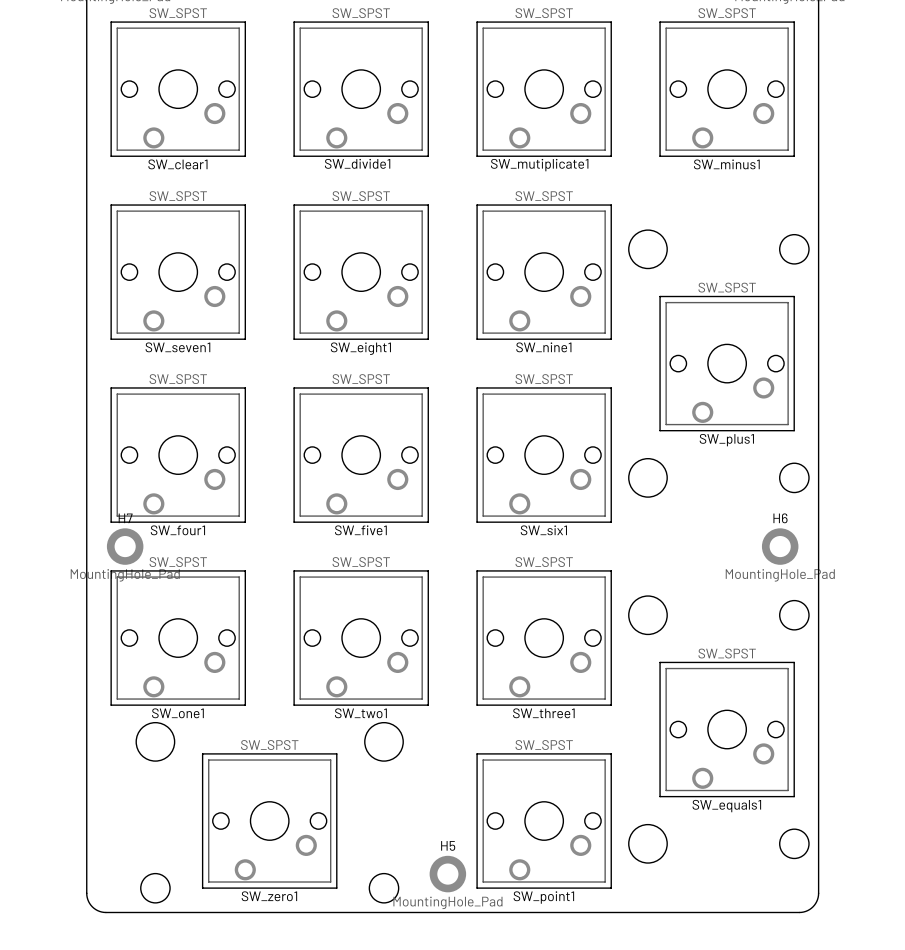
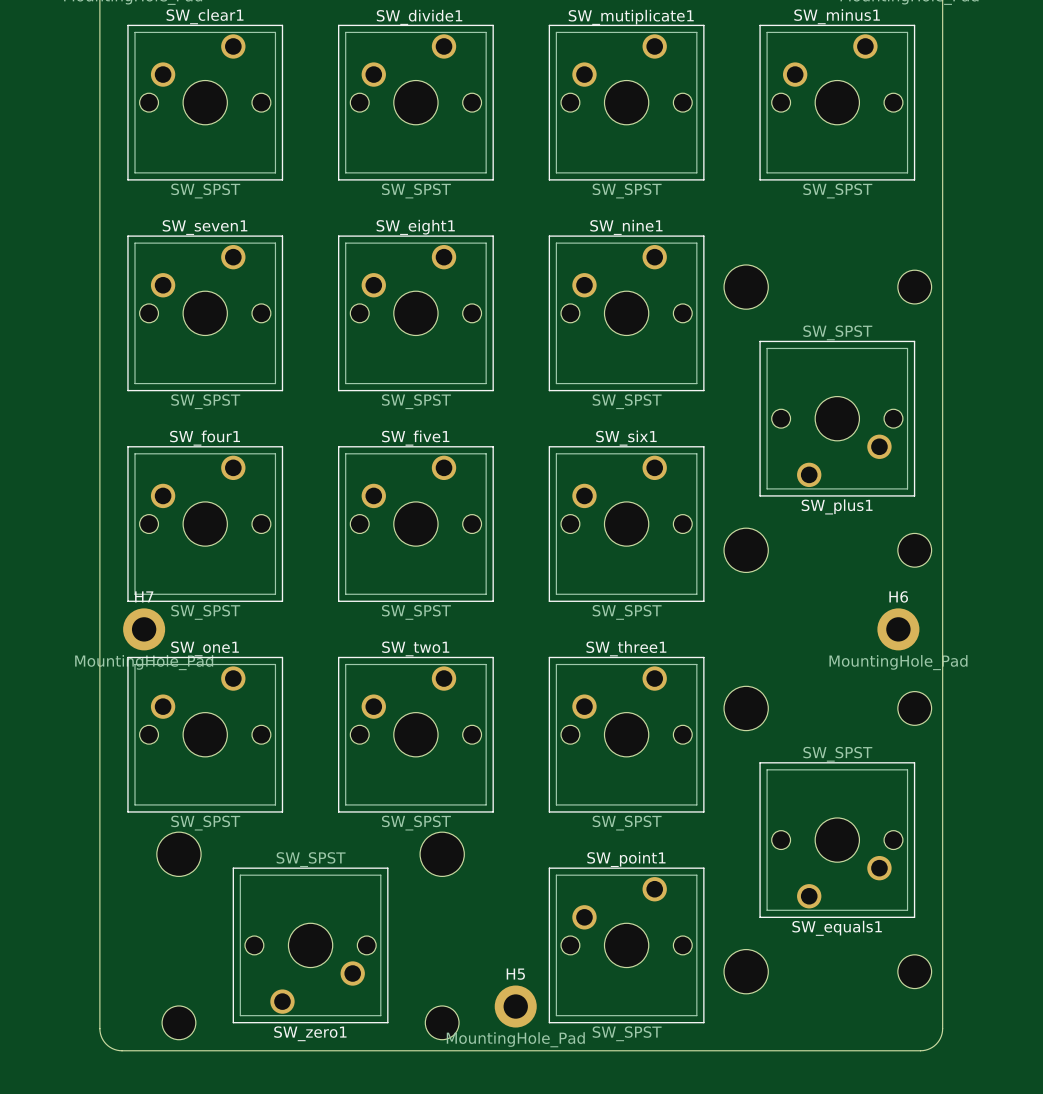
SW_clear1 rotation: 0° (178, 89) -> 180° (205, 102)
SW_divide1 rotation: 0° (361, 89) -> 180° (415, 102)
SW_mutiplicate1 rotation: 0° (544, 89) -> 180° (626, 102)
SW_minus1 rotation: 0° (727, 89) -> 180° (837, 102)
SW_seven1 rotation: 0° (178, 272) -> 180° (205, 313)
SW_eight1 rotation: 0° (361, 272) -> 180° (415, 313)
SW_nine1 rotation: 0° (544, 272) -> 180° (626, 313)
SW_four1 rotation: 0° (178, 455) -> 180° (205, 524)
SW_five1 rotation: 0° (361, 455) -> 180° (415, 524)
SW_six1 rotation: 0° (544, 455) -> 180° (626, 524)
SW_one1 rotation: 0° (178, 638) -> 180° (205, 734)
SW_two1 rotation: 0° (361, 638) -> 180° (415, 734)
SW_three1 rotation: 0° (544, 638) -> 180° (626, 734)
SW_point1 rotation: 0° (544, 821) -> 180° (626, 945)

